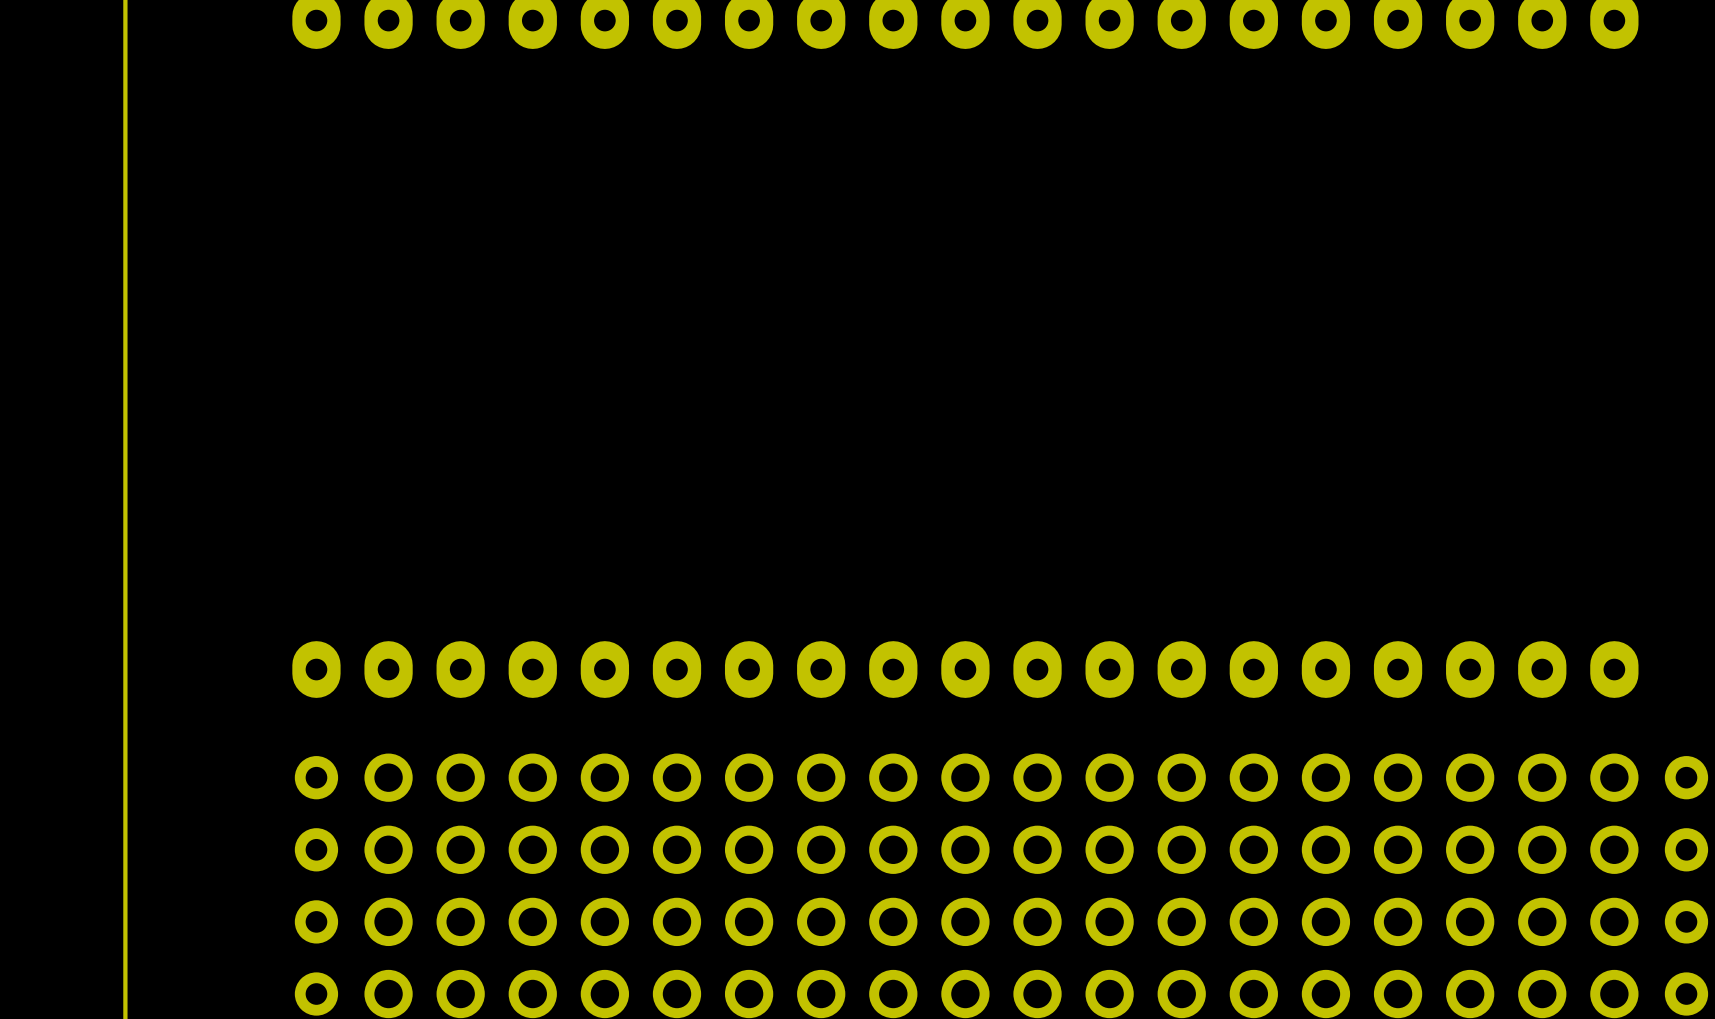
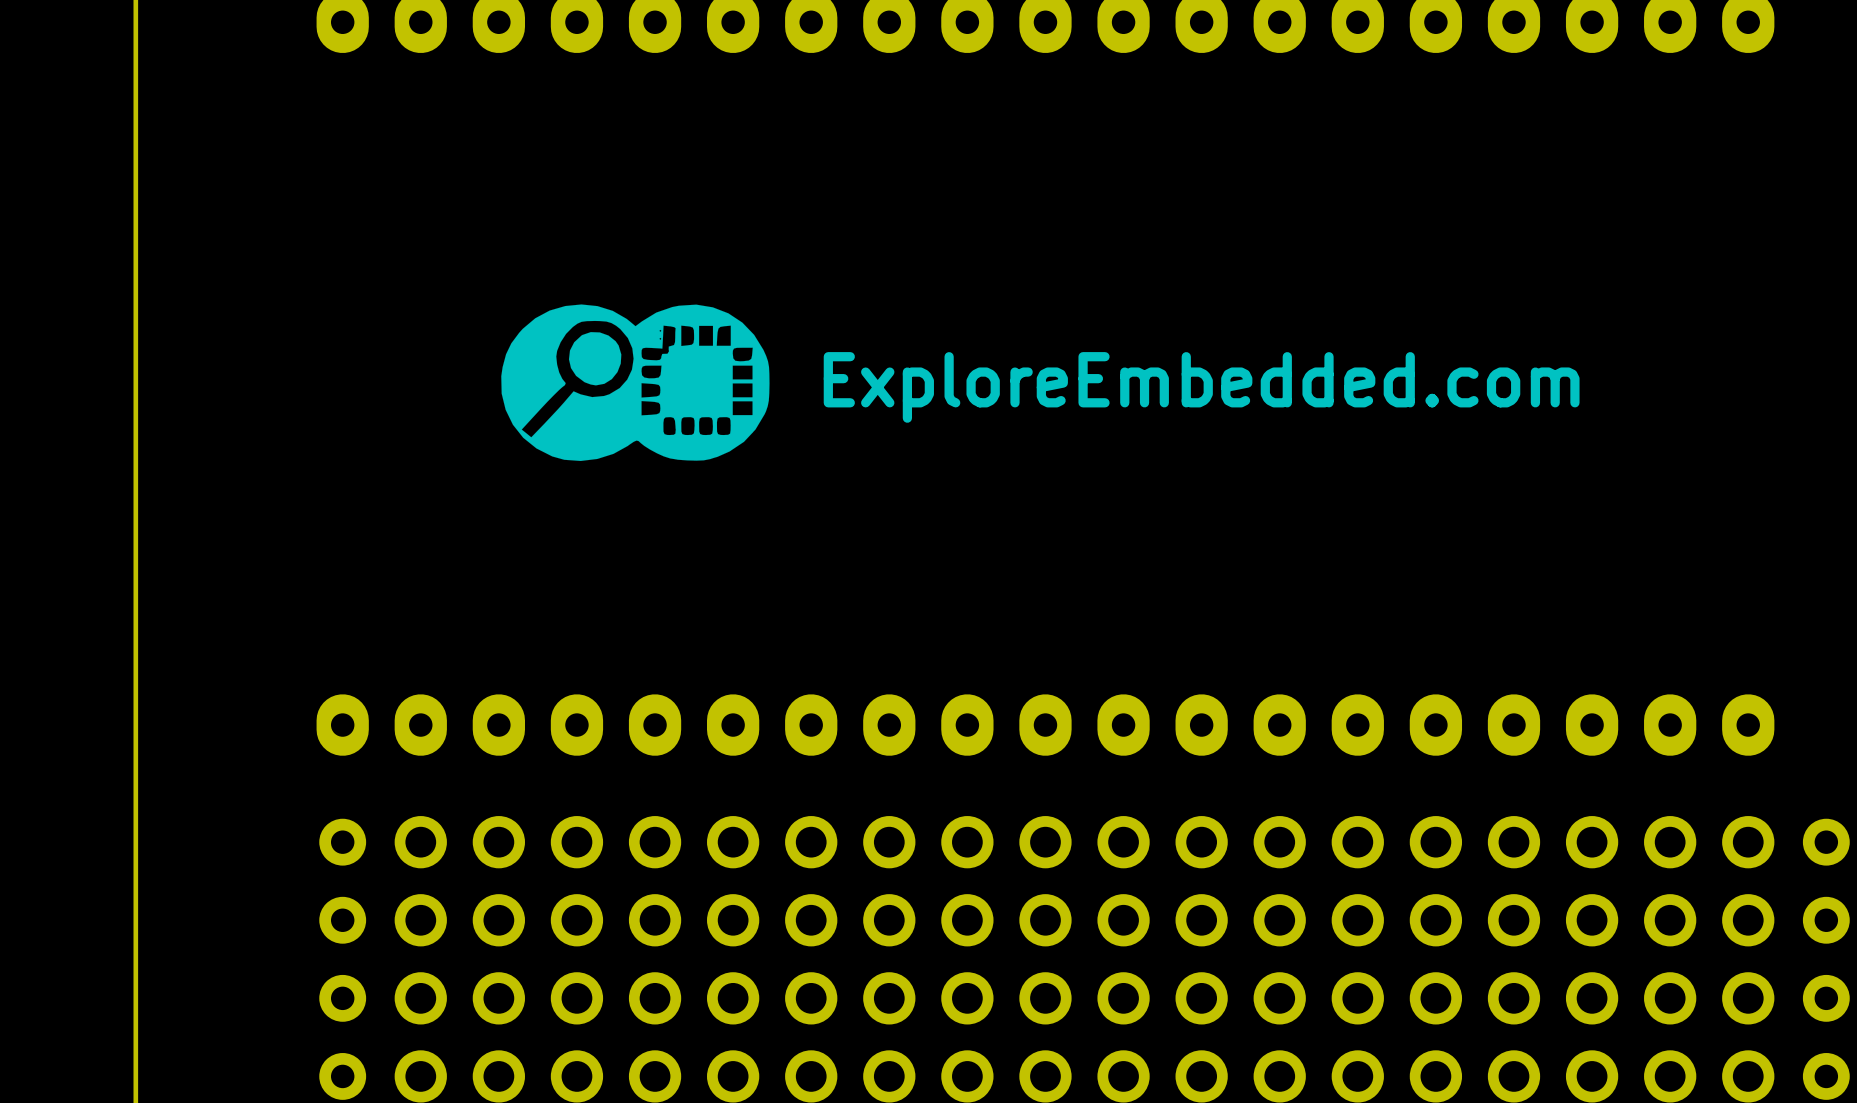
drawing: none -> [501, 304, 770, 462]
text: none -> ExploreEmbedded.com (1201, 387)

